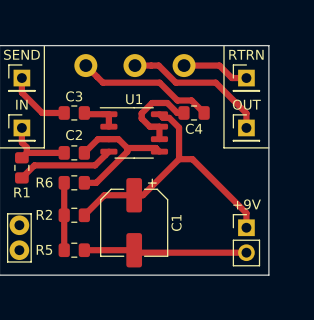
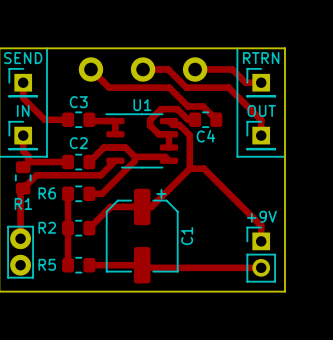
track: none -> (23, 188) (20, 191) (20, 238)

